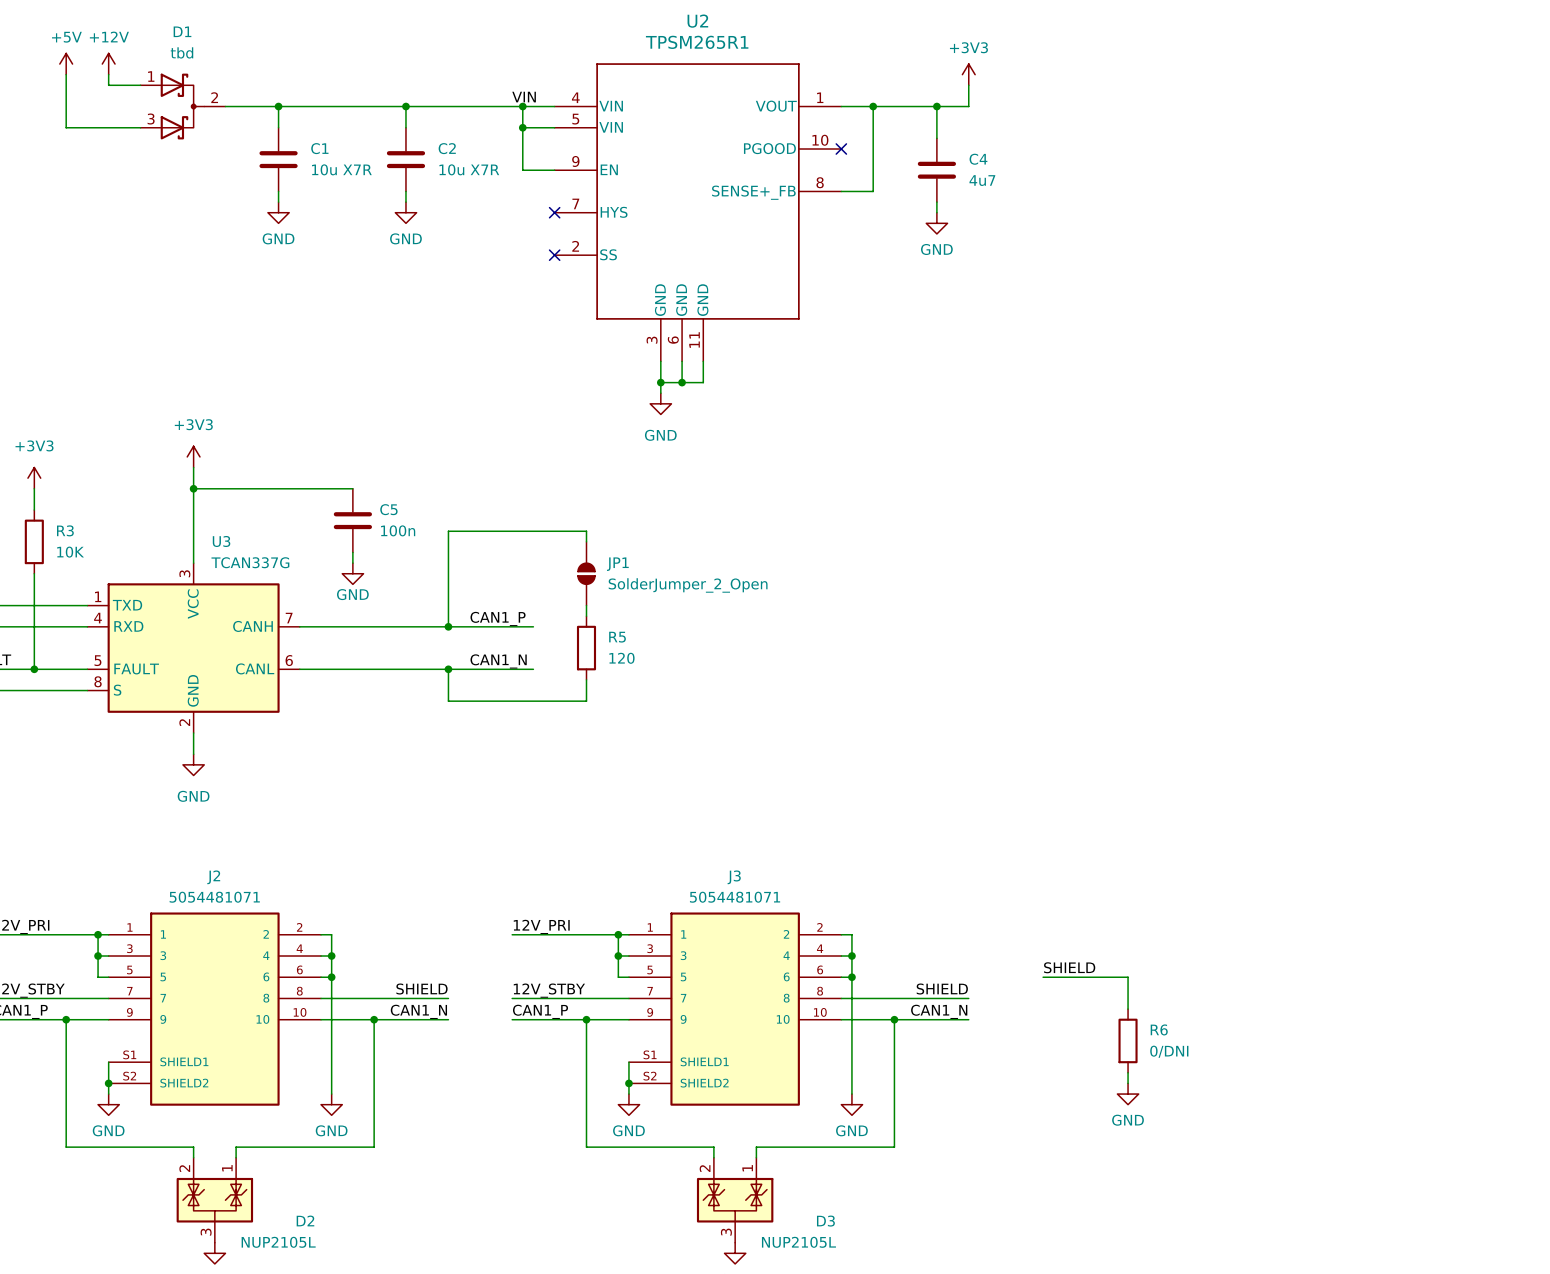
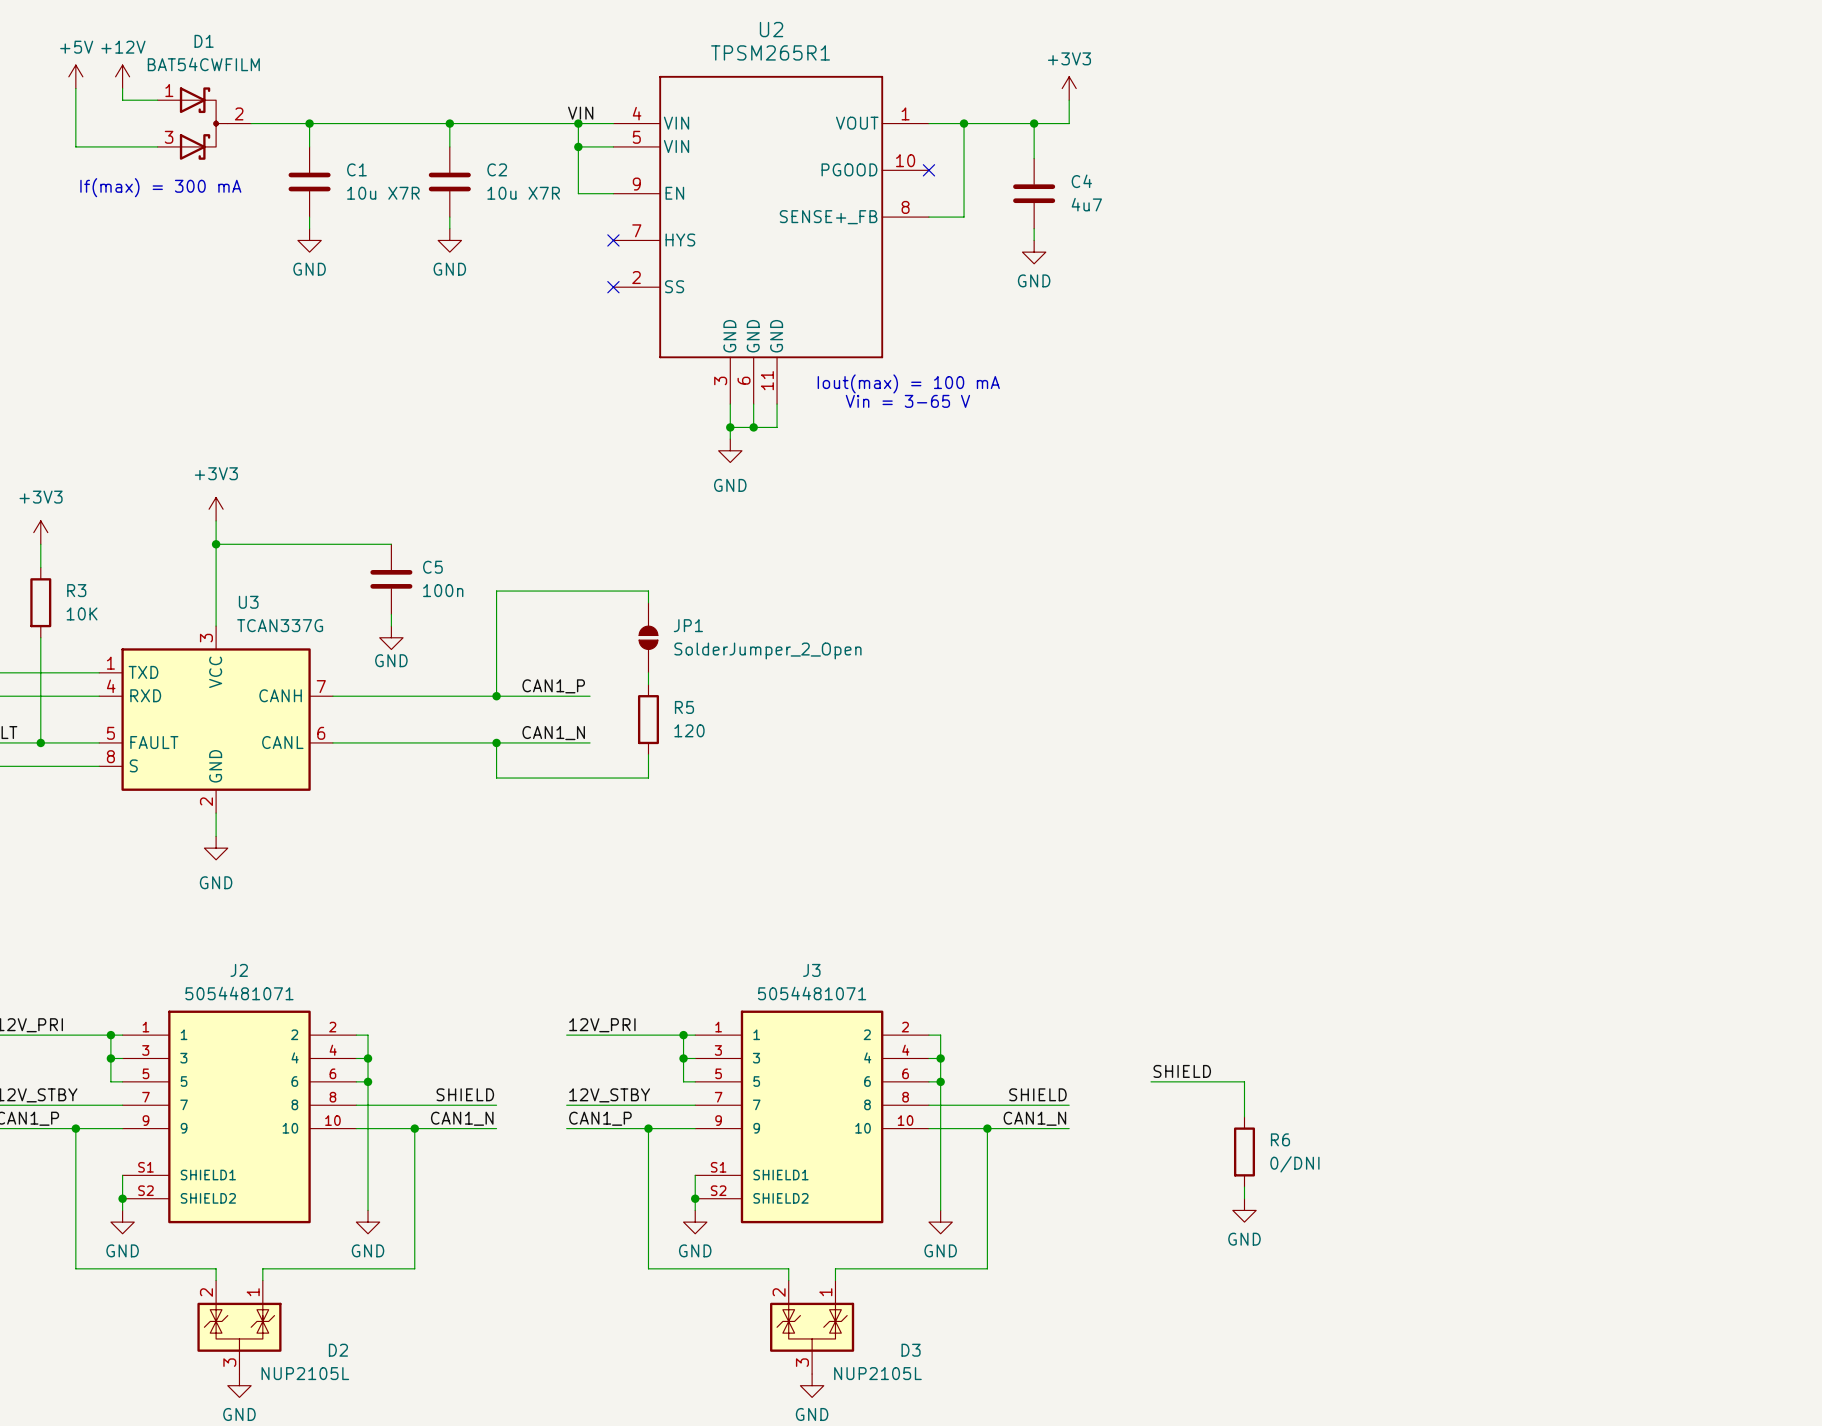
D1 value: tbd (181, 52) -> BAT54CWFILM (203, 64)
text: none -> If(max) = 300 mA (160, 187)
text: none -> Iout(max) = 100 mA (908, 383)
text: none -> Vin = 3-65 V (907, 401)

